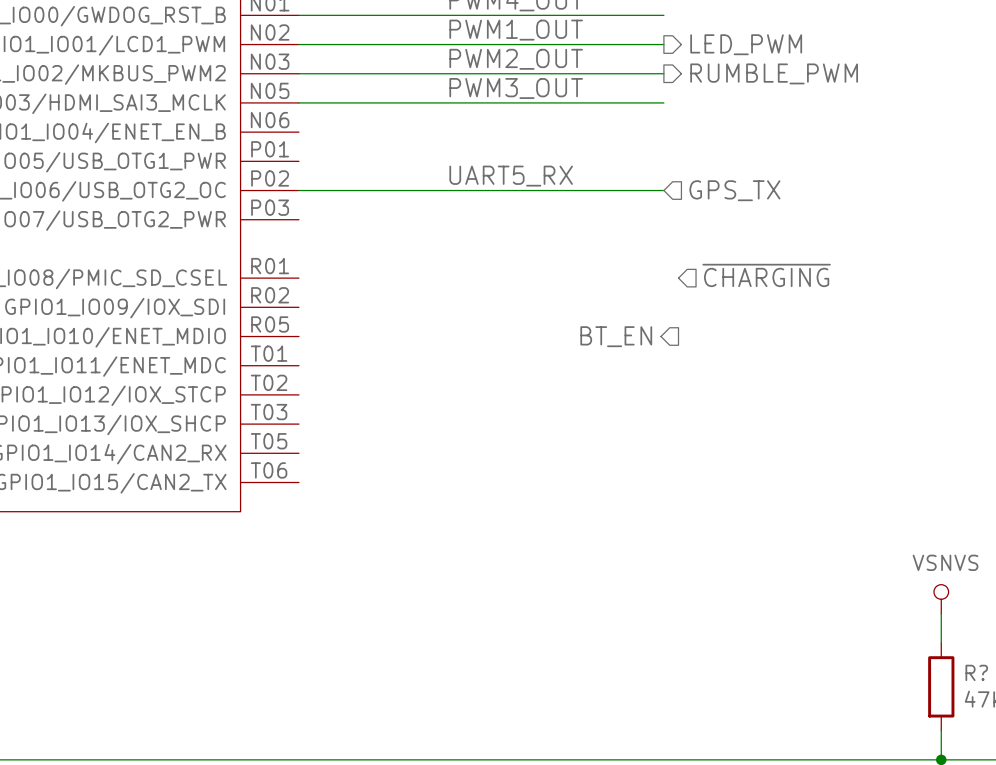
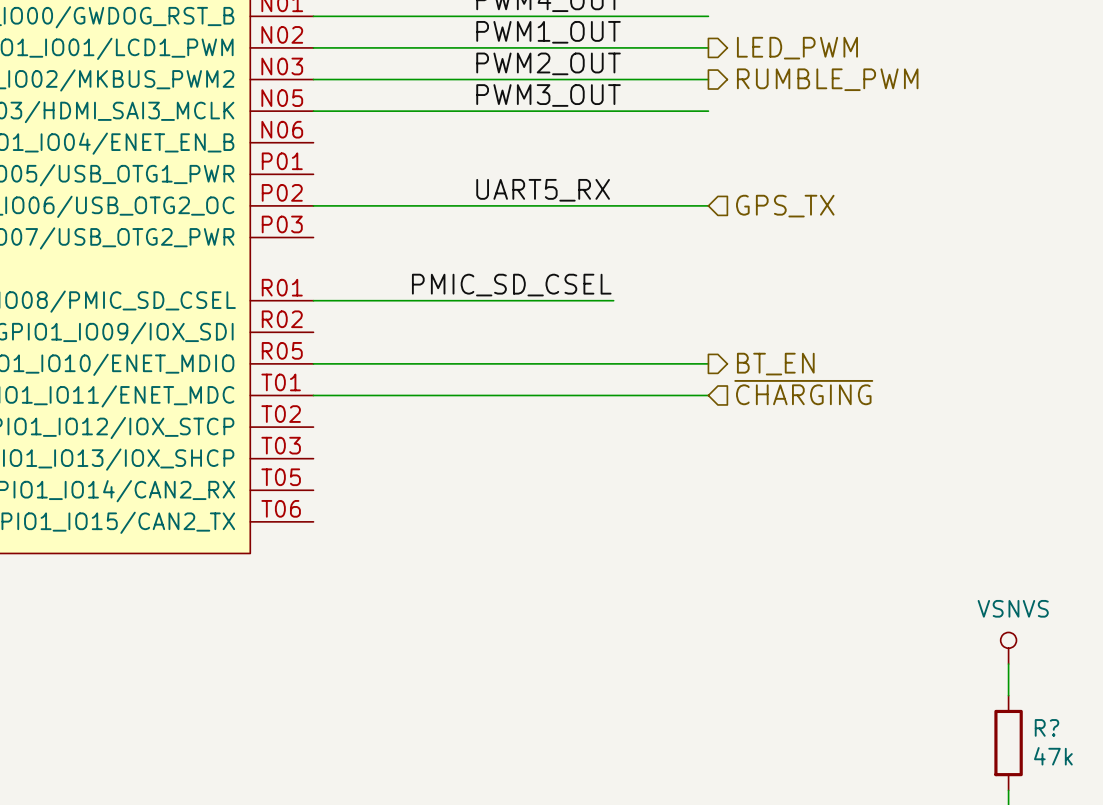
label: none -> PMIC_SD_CSEL (511, 285)
hierarchical label position: ~{CHARGING} (766, 275) -> ~{CHARGING} (803, 392)
wire: none -> (313, 300) (613, 300)
wire: none -> (313, 363) (708, 363)
hierarchical label rotation: 0° (616, 336) -> 180° (775, 364)
hierarchical label position: BT_EN (616, 336) -> BT_EN (775, 364)
wire: none -> (313, 395) (708, 395)

